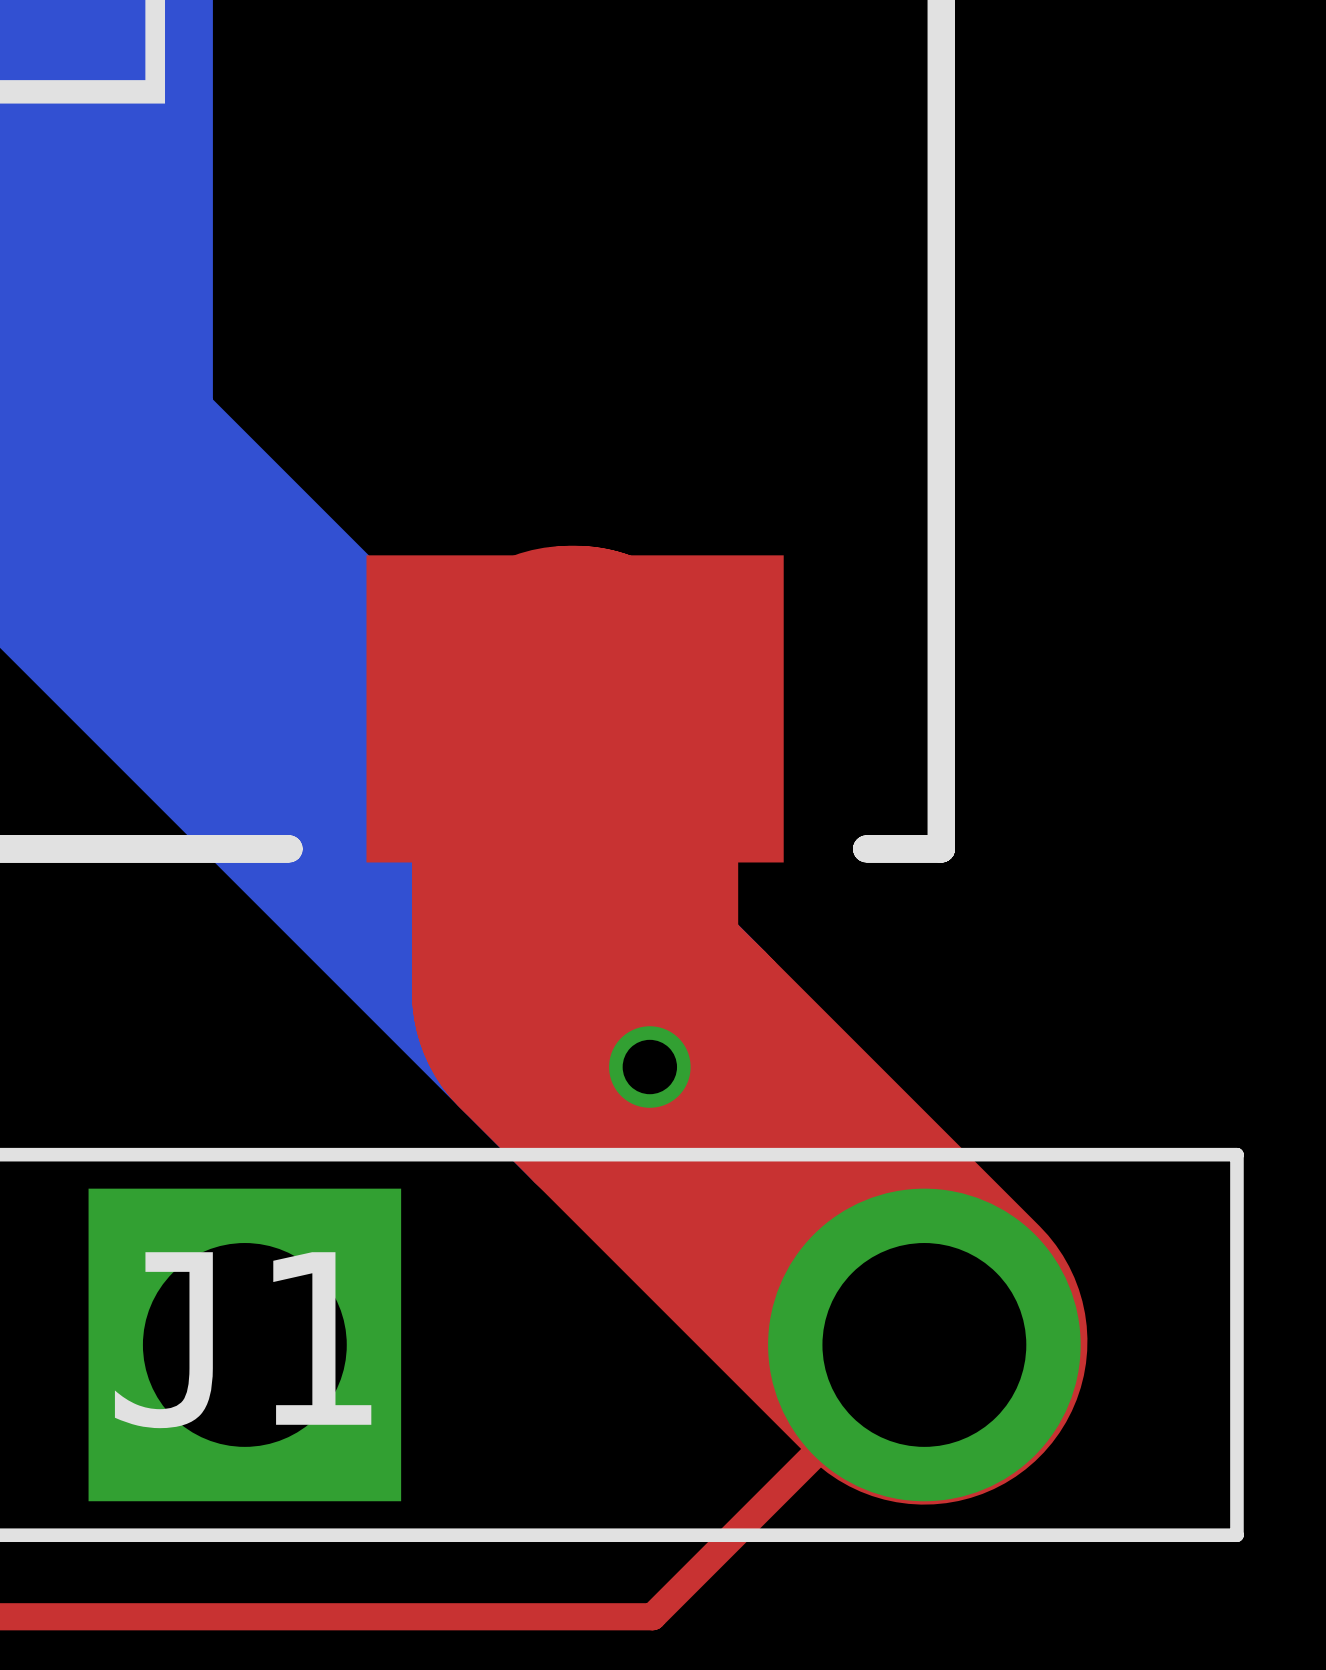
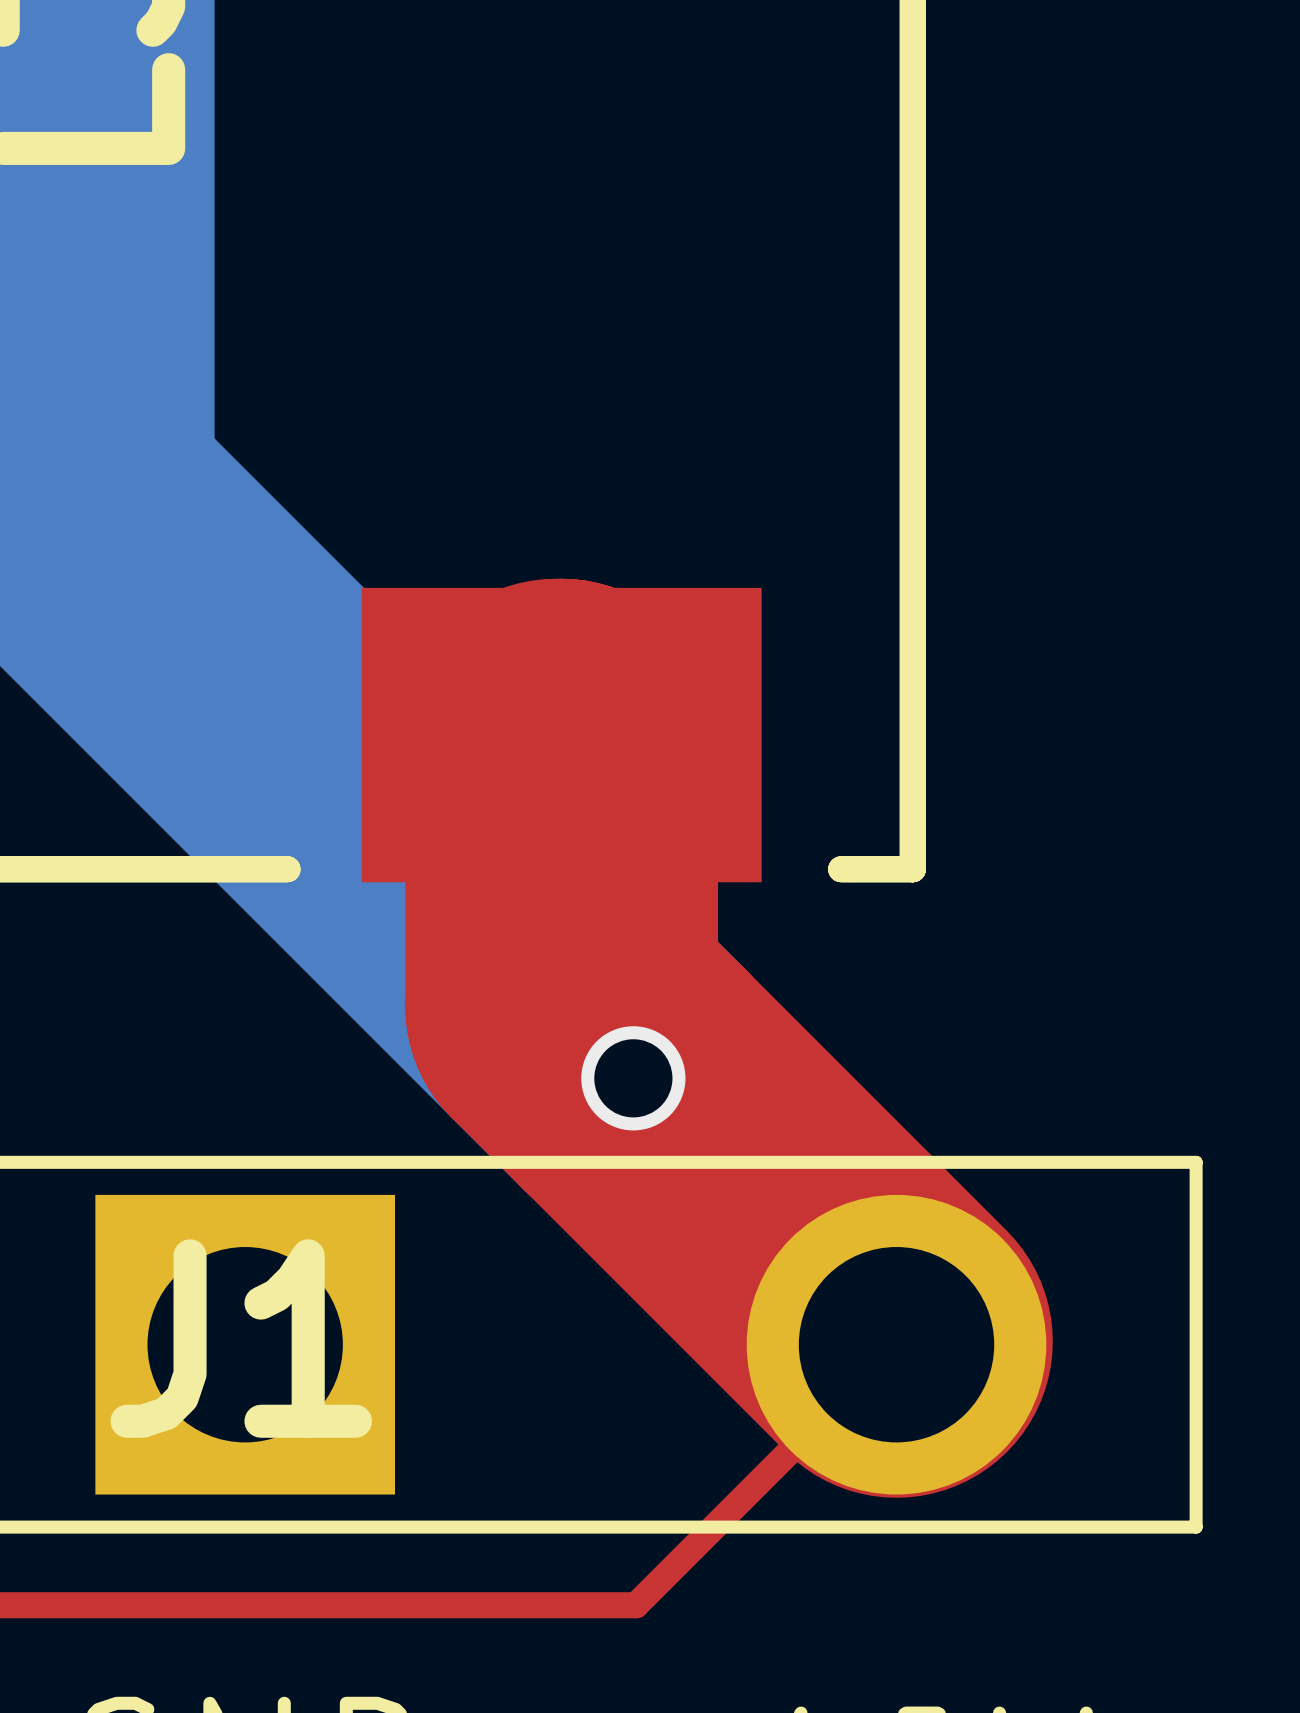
via size: [609, 1026, 691, 1108] -> [581, 1026, 686, 1131]

